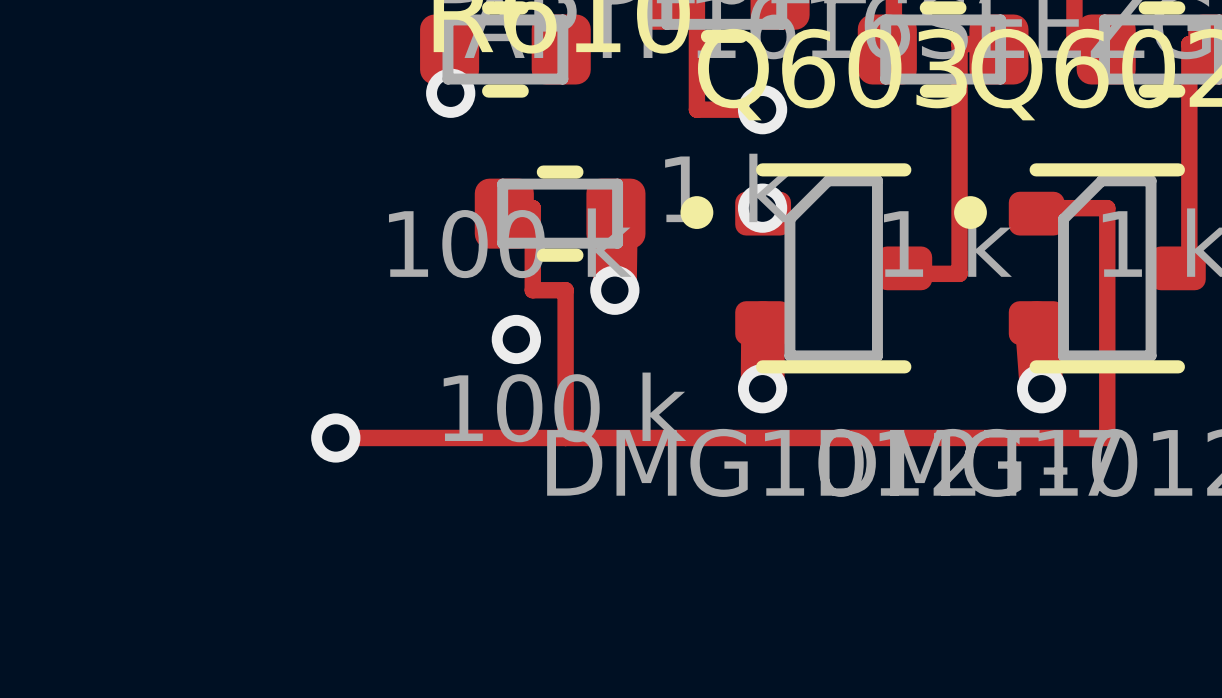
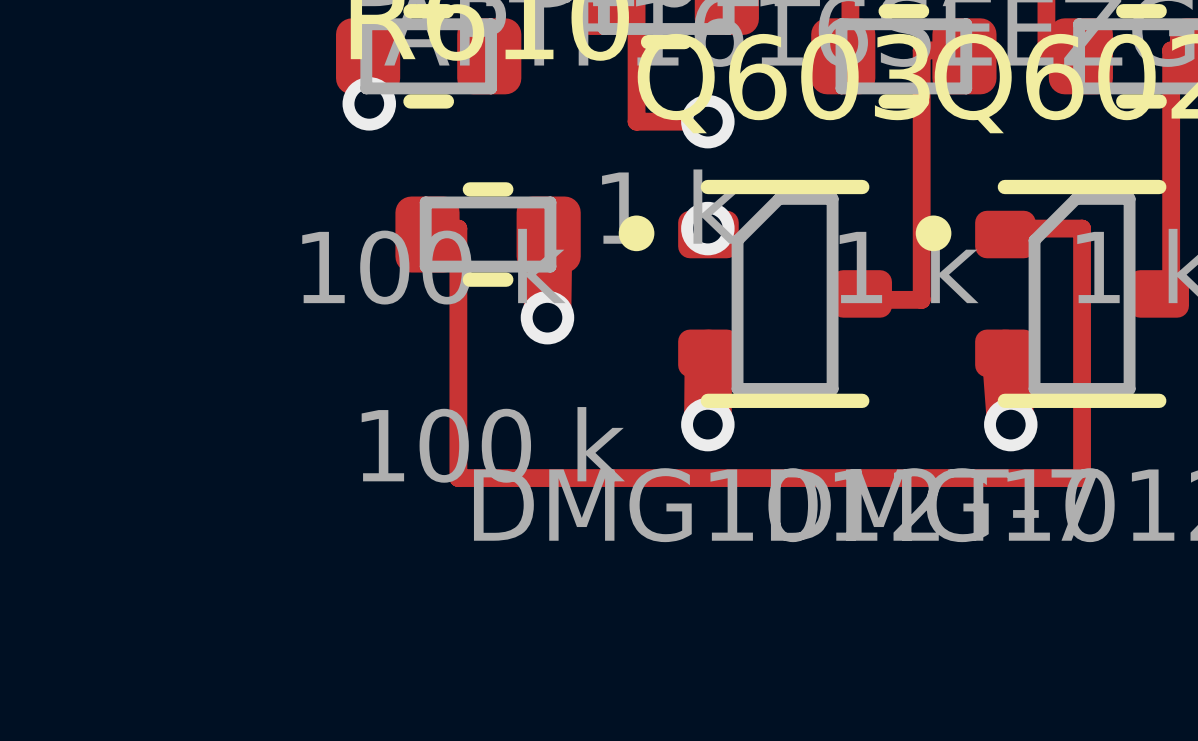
track: (532, 290) (565, 290) (565, 437) -> (458, 317) (458, 478)
via: (516, 339) -> none
track: (335, 437) (532, 437) -> none
via: (335, 437) -> none

